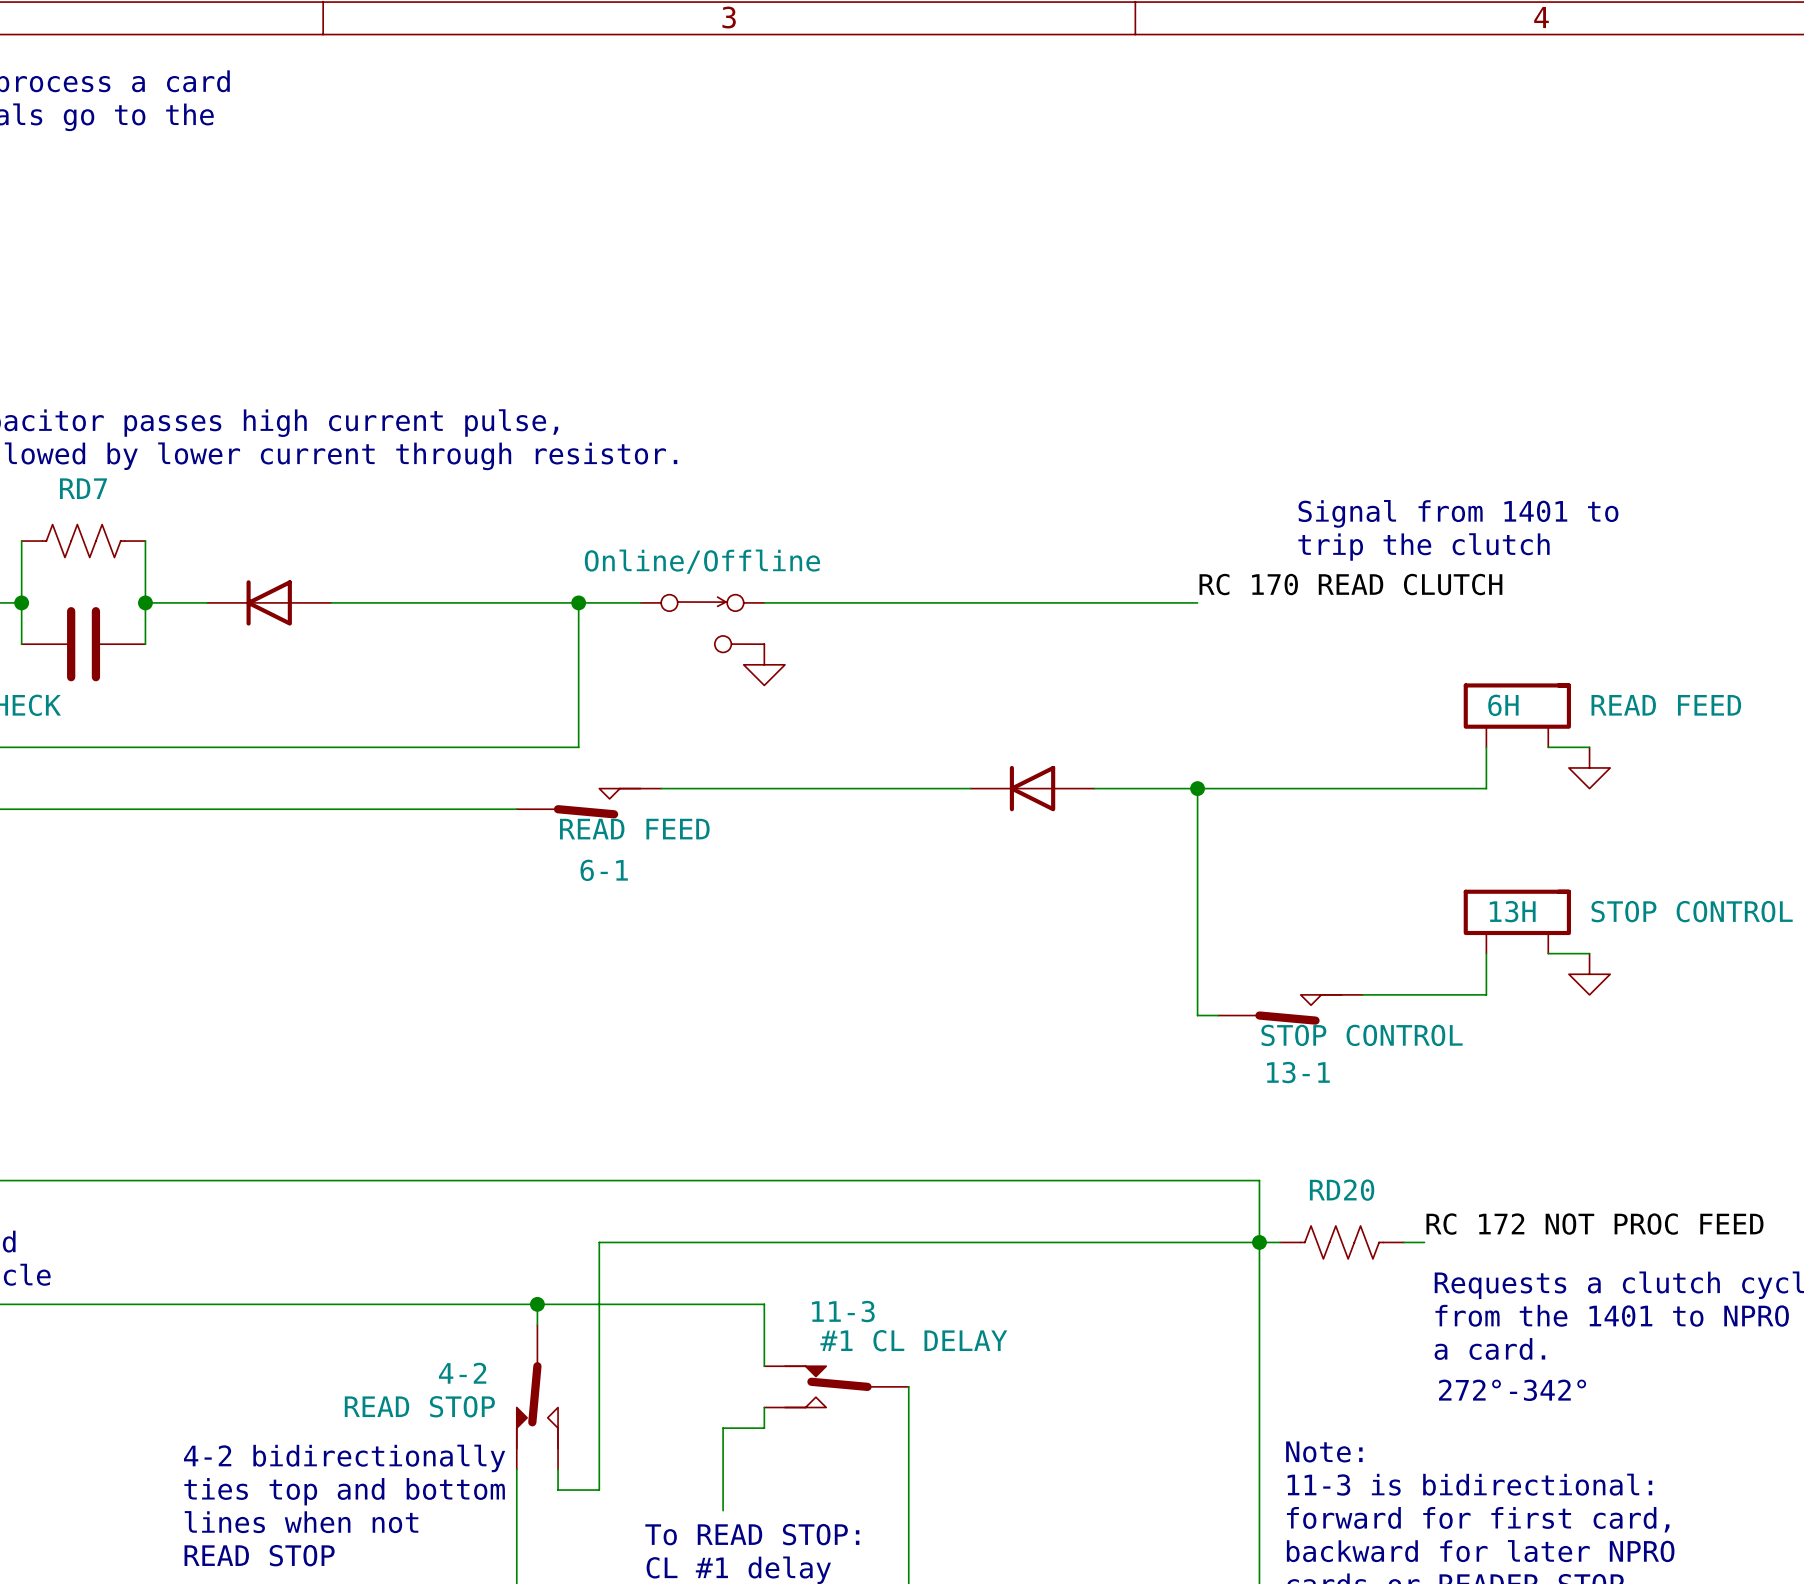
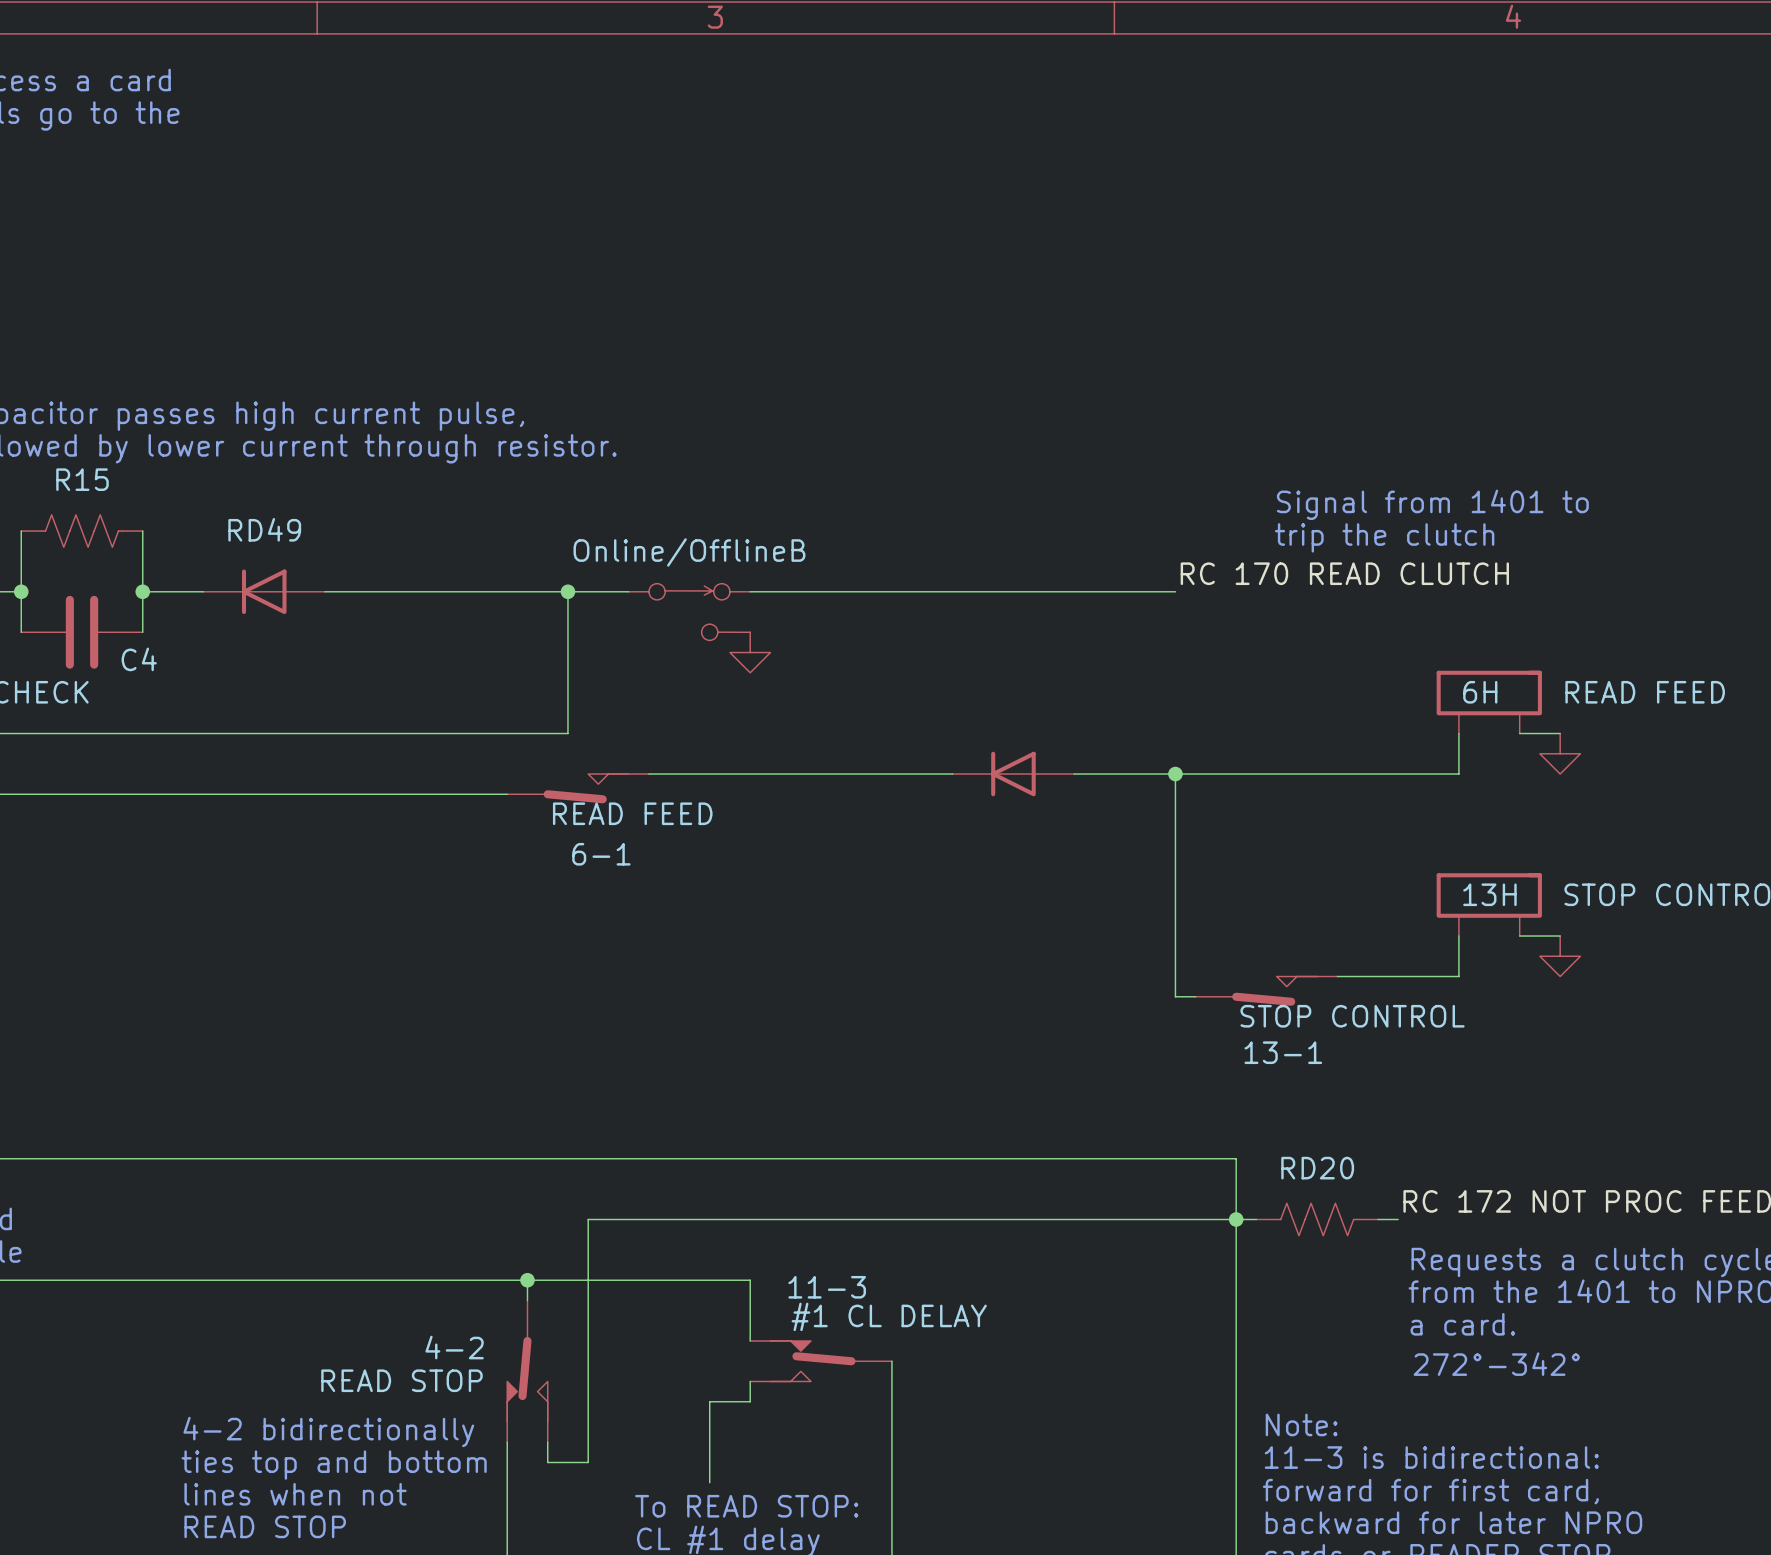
RD7 name: RD7 (83, 488) -> R15 (82, 479)
RD49 name: none -> RD49 (264, 529)
Online/Offline name: Online/Offline (702, 561) -> Online/OfflineB (689, 552)
C4 name: none -> C4 (139, 659)

